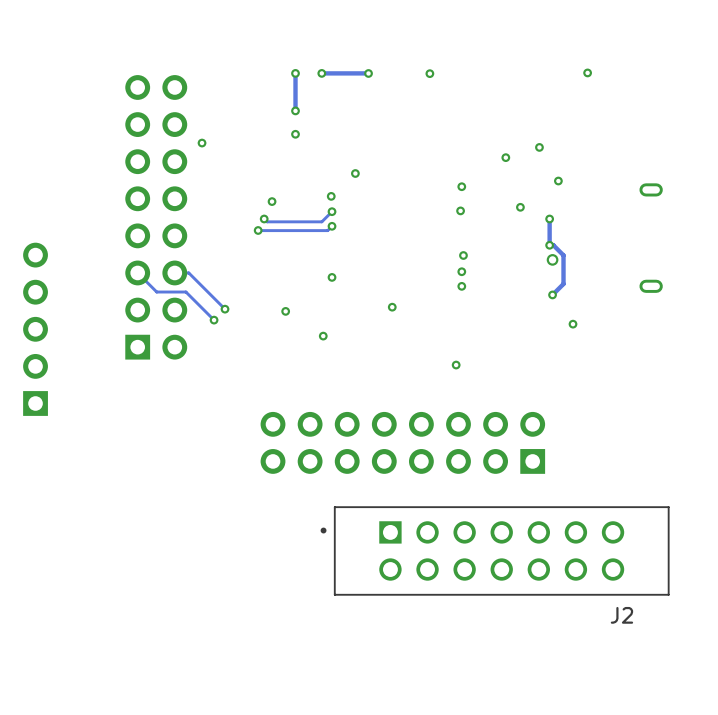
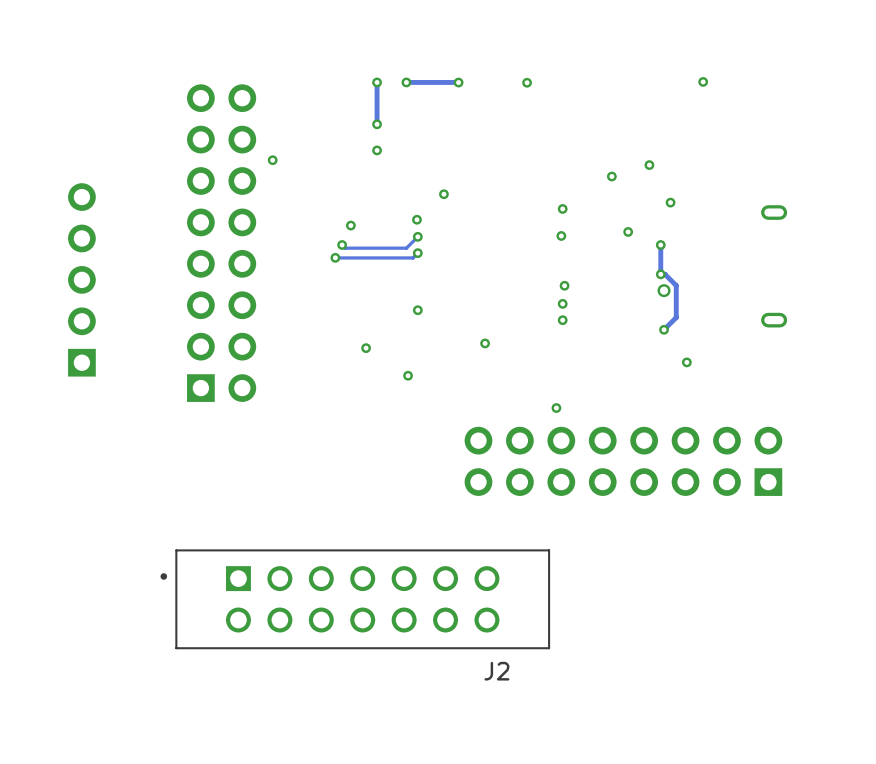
track: (137, 272) (156, 292) (185, 292) (214, 320) -> none
track: (174, 272) (188, 272) (225, 309) -> none
via: (225, 309) -> none
via: (214, 320) -> none
part position: (35, 329) -> (81, 279)
part position: (402, 442) -> (623, 461)
J2 position: (495, 550) -> (355, 599)

